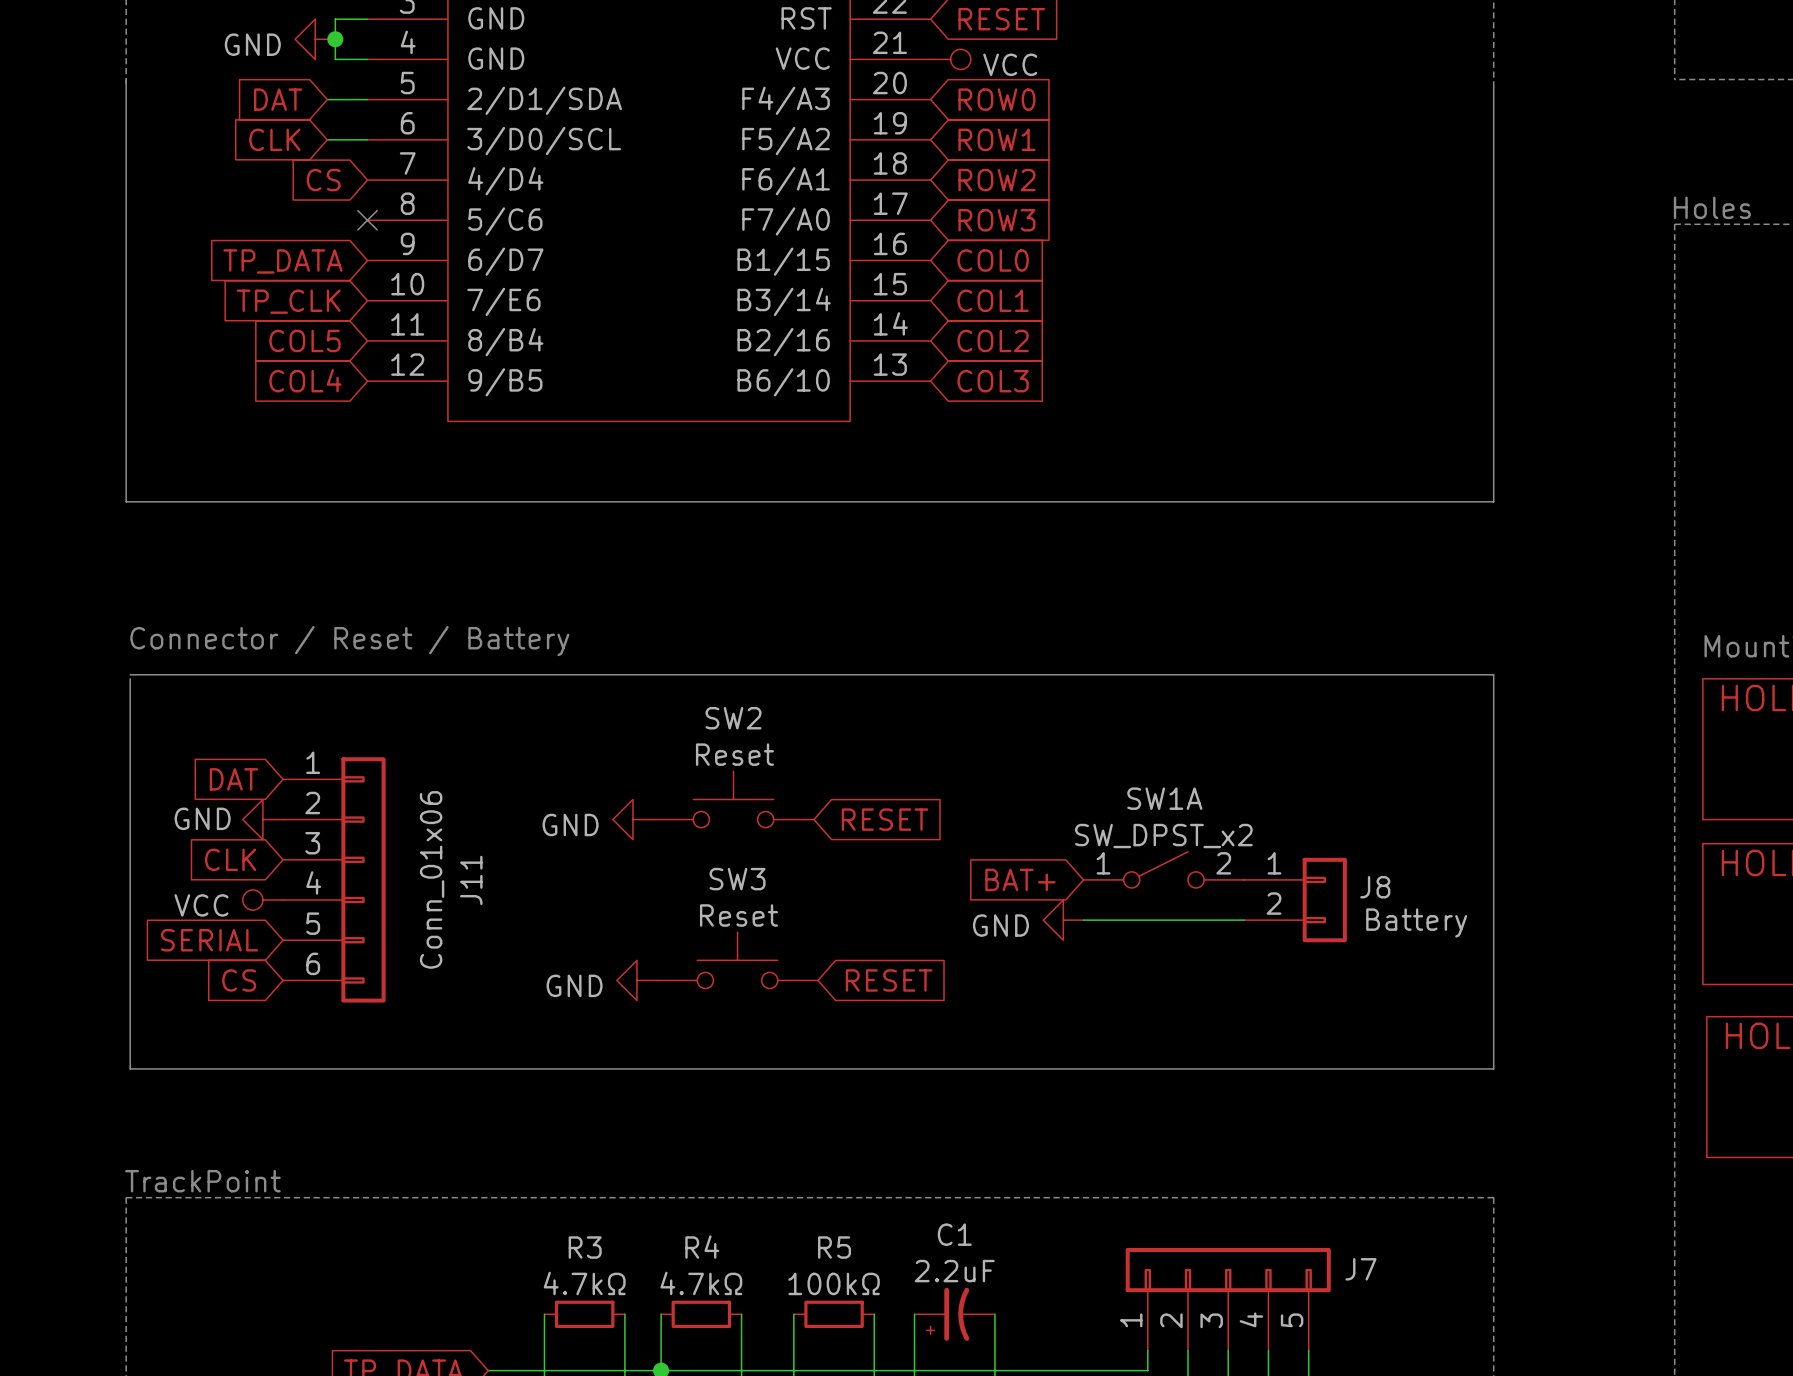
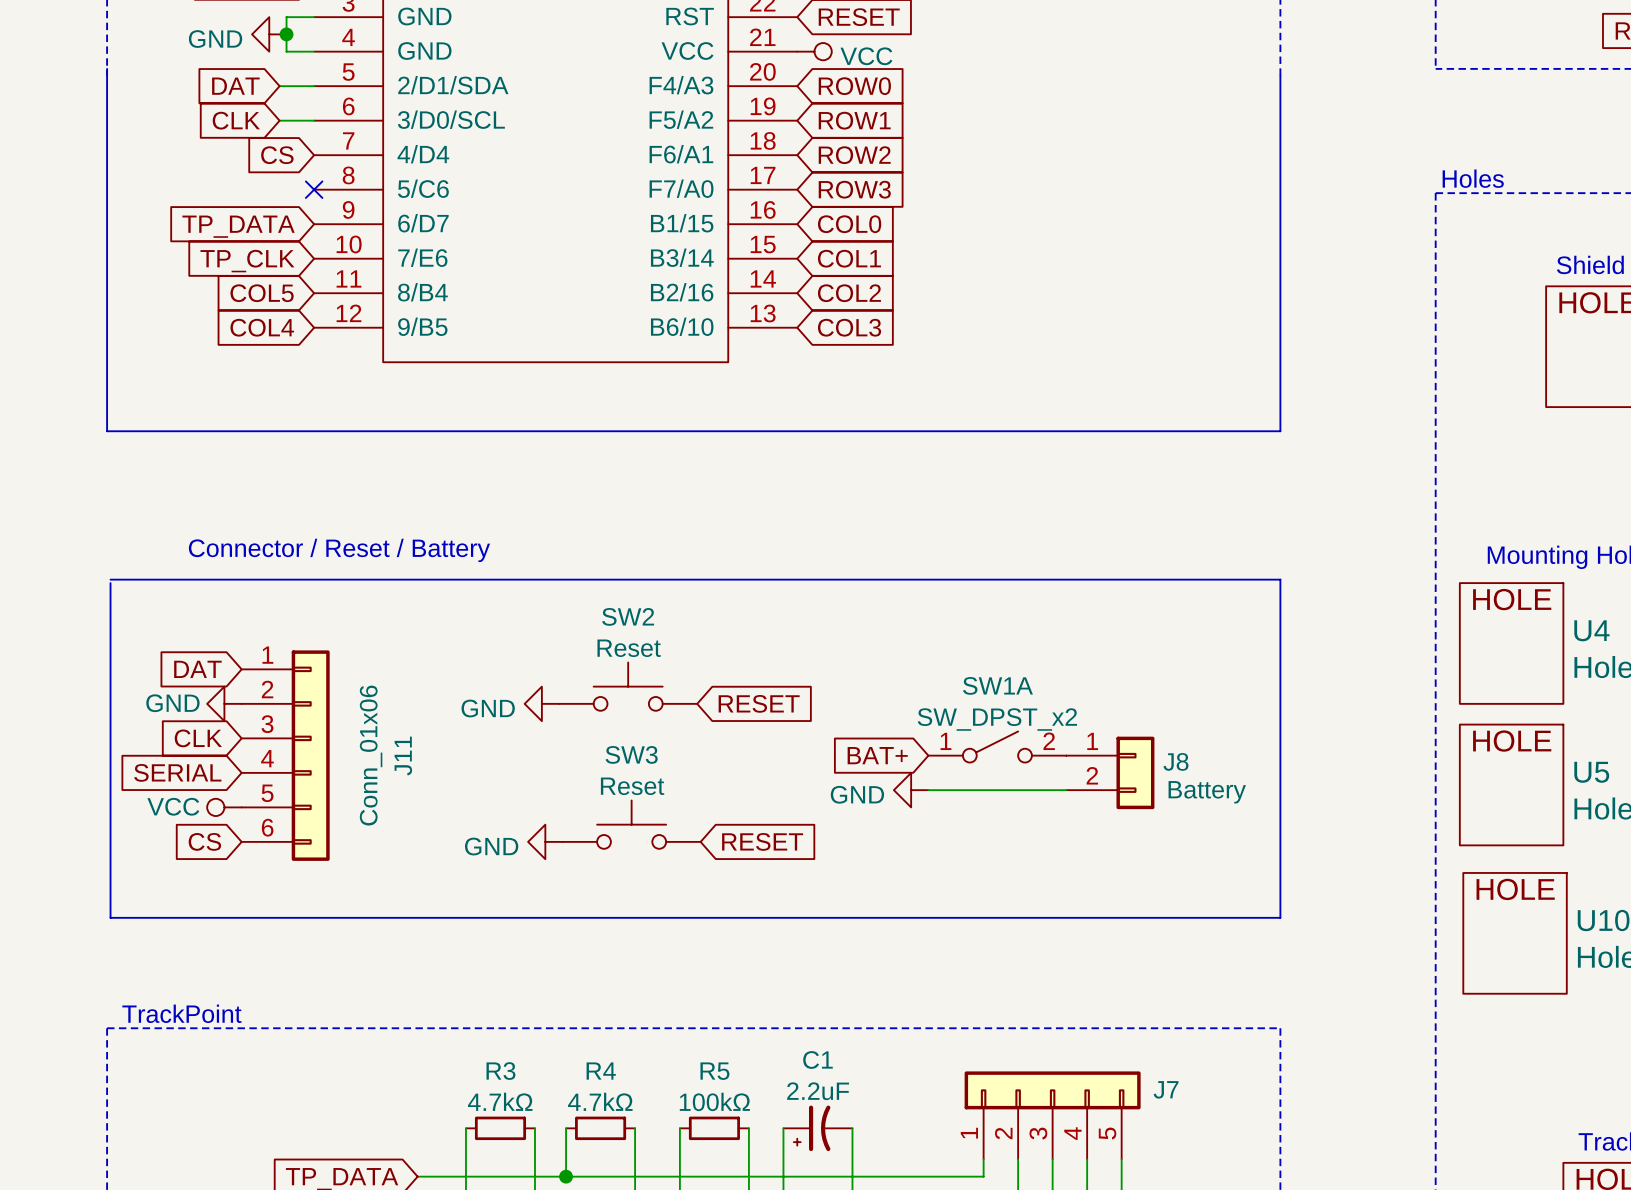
power symbol position: VCC (262, 900) -> VCC (224, 807)
power symbol text position: VCC (201, 905) -> VCC (173, 806)
global label position: SERIAL (209, 940) -> SERIAL (177, 772)

